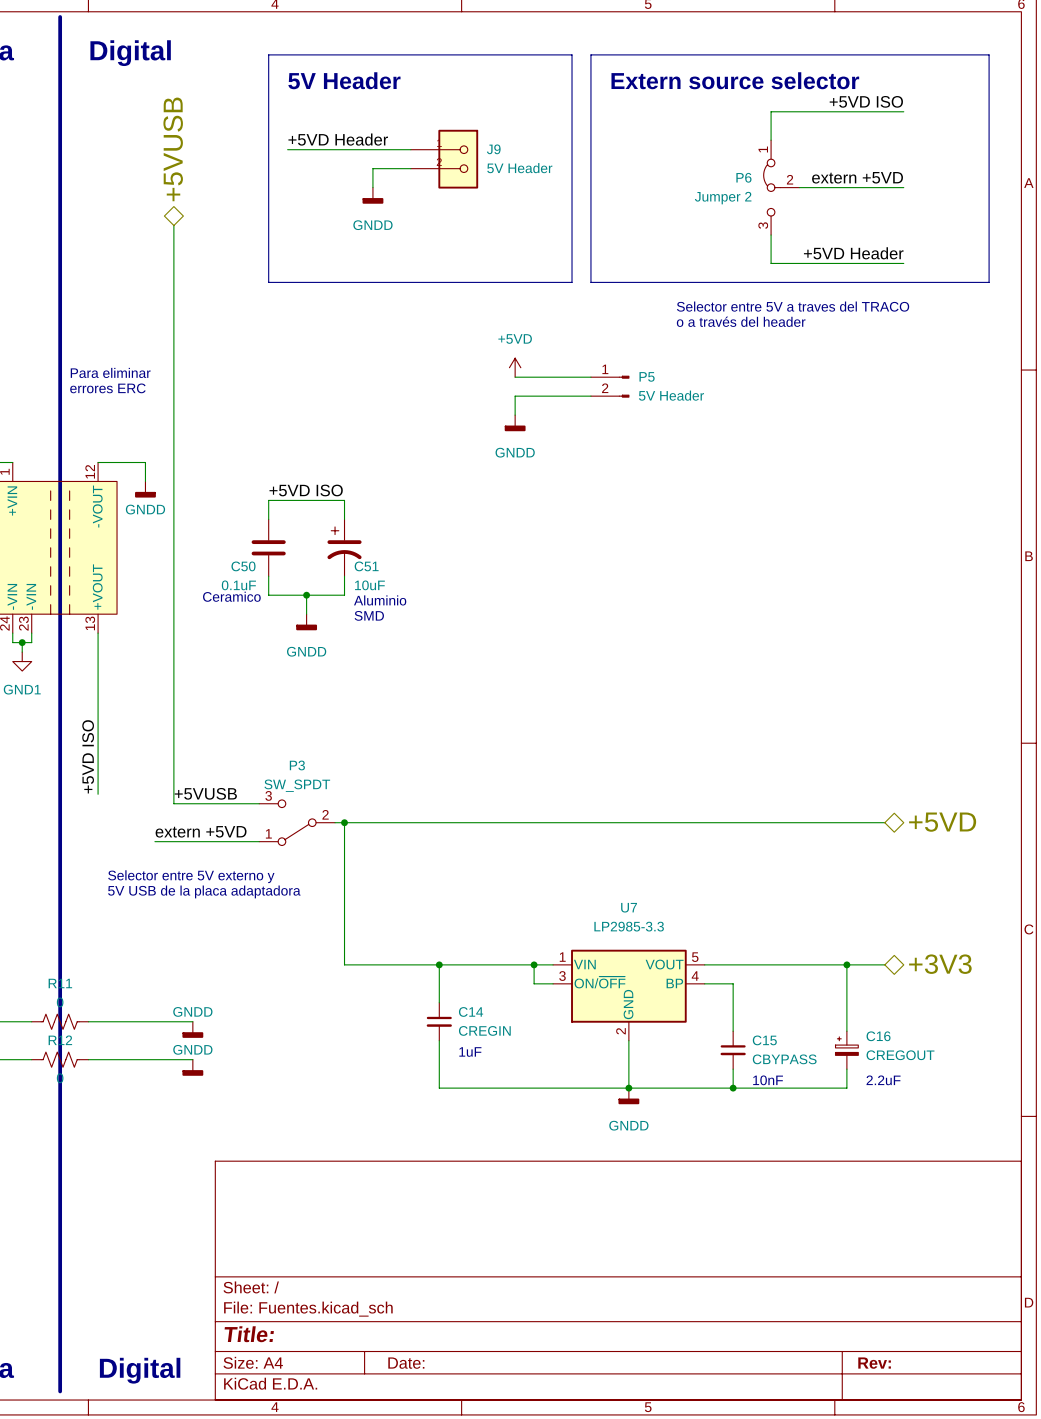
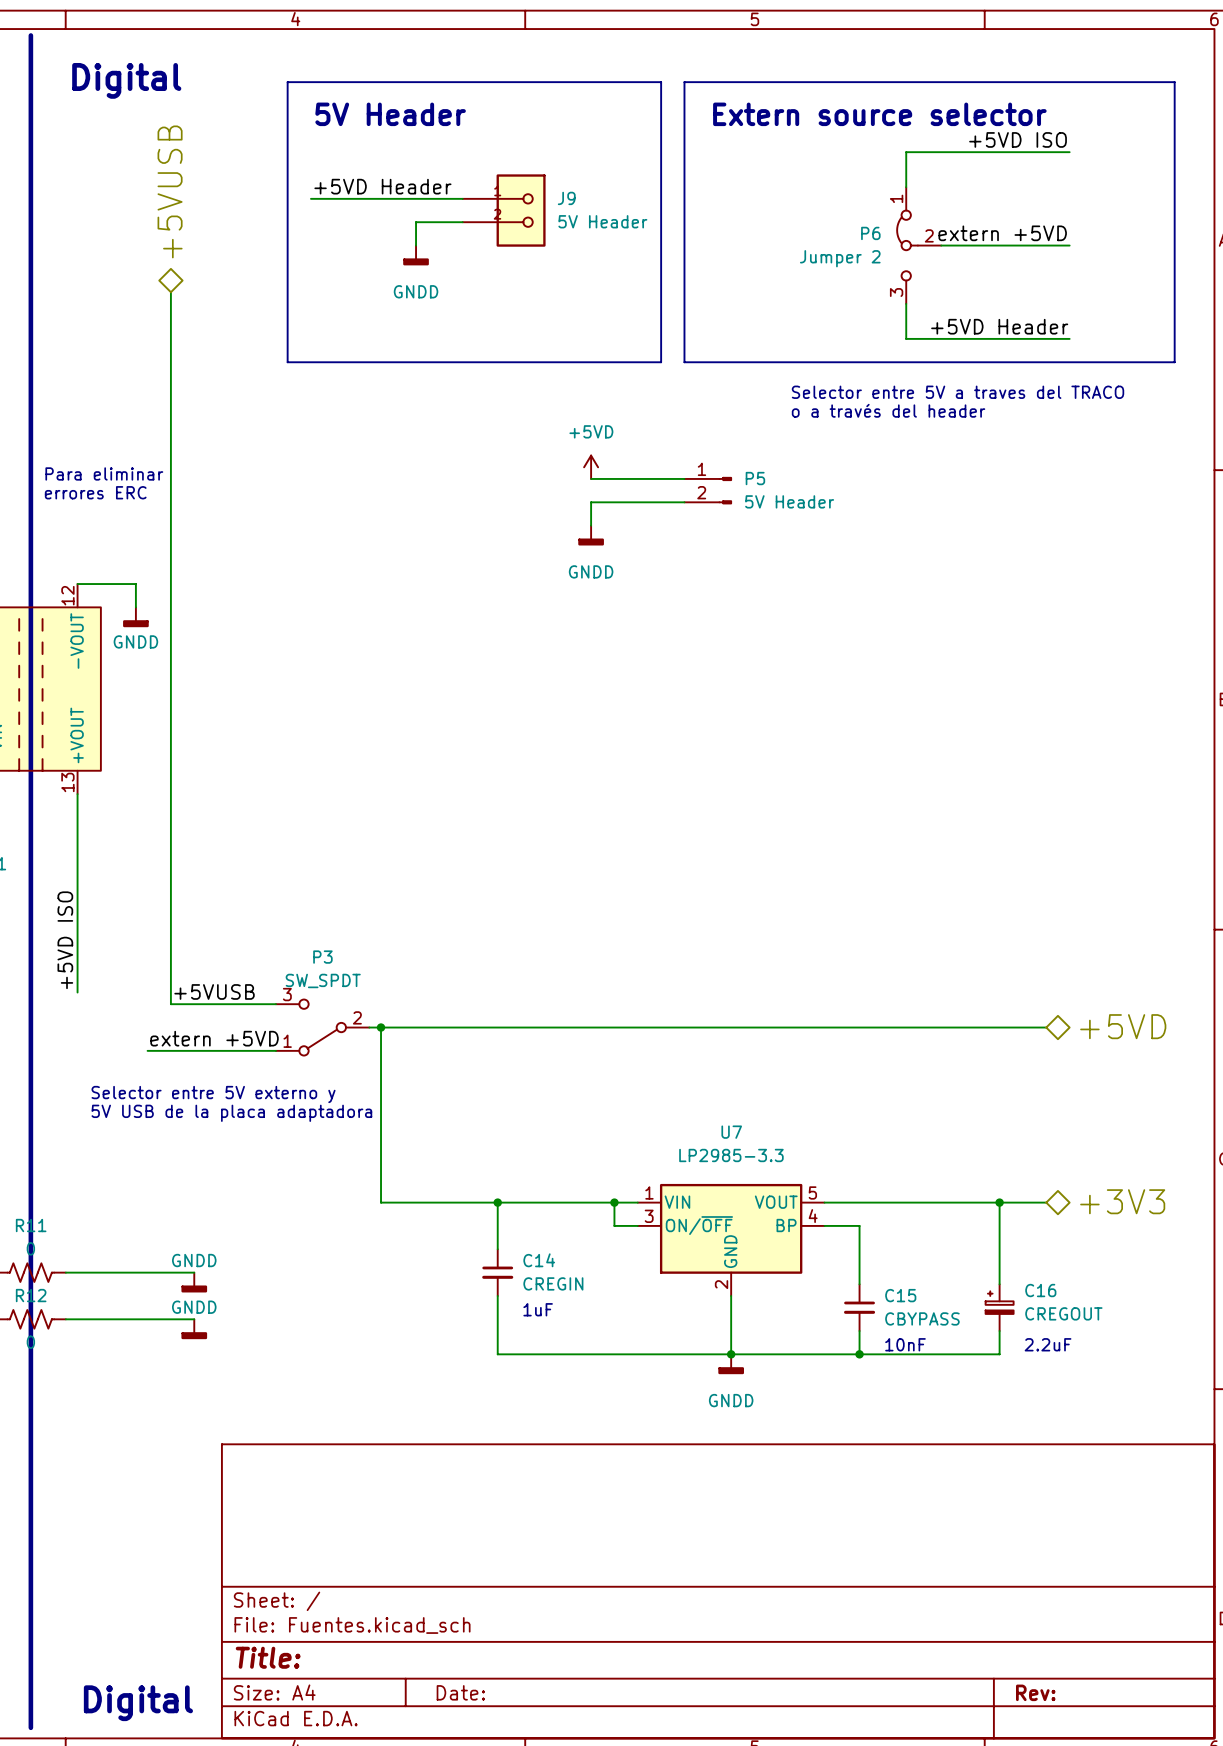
label: +5VD ISO (306, 490) -> none
wire: (268, 519) (268, 500) (344, 500) (344, 519) -> none
C50: 0.1uF (268, 547) -> none
C51: 10uF (344, 547) -> none
wire: (268, 576) (268, 595) (344, 595) (344, 576) -> none
wire: (306, 595) (306, 614) -> none
junction: (306, 595) -> none
text: Ceramico (231, 596) -> none
text: Aluminio (380, 600) -> none
text: SMD (369, 615) -> none
power symbol: GNDD (306, 622) -> none

